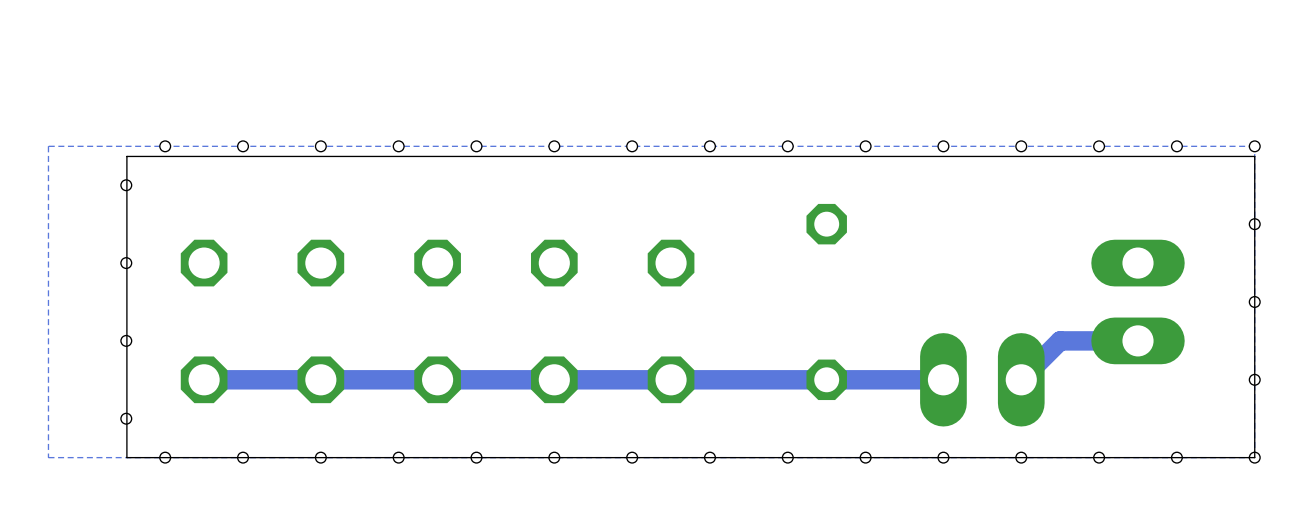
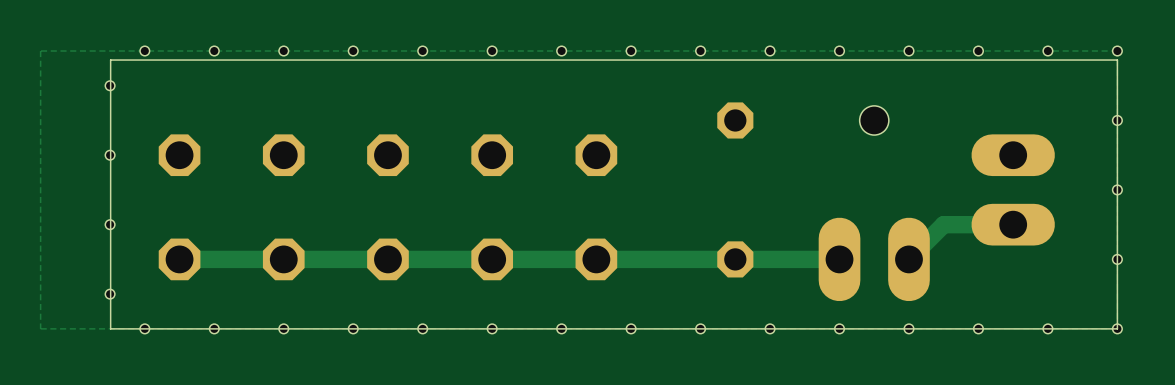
hole: none -> (874, 120)

